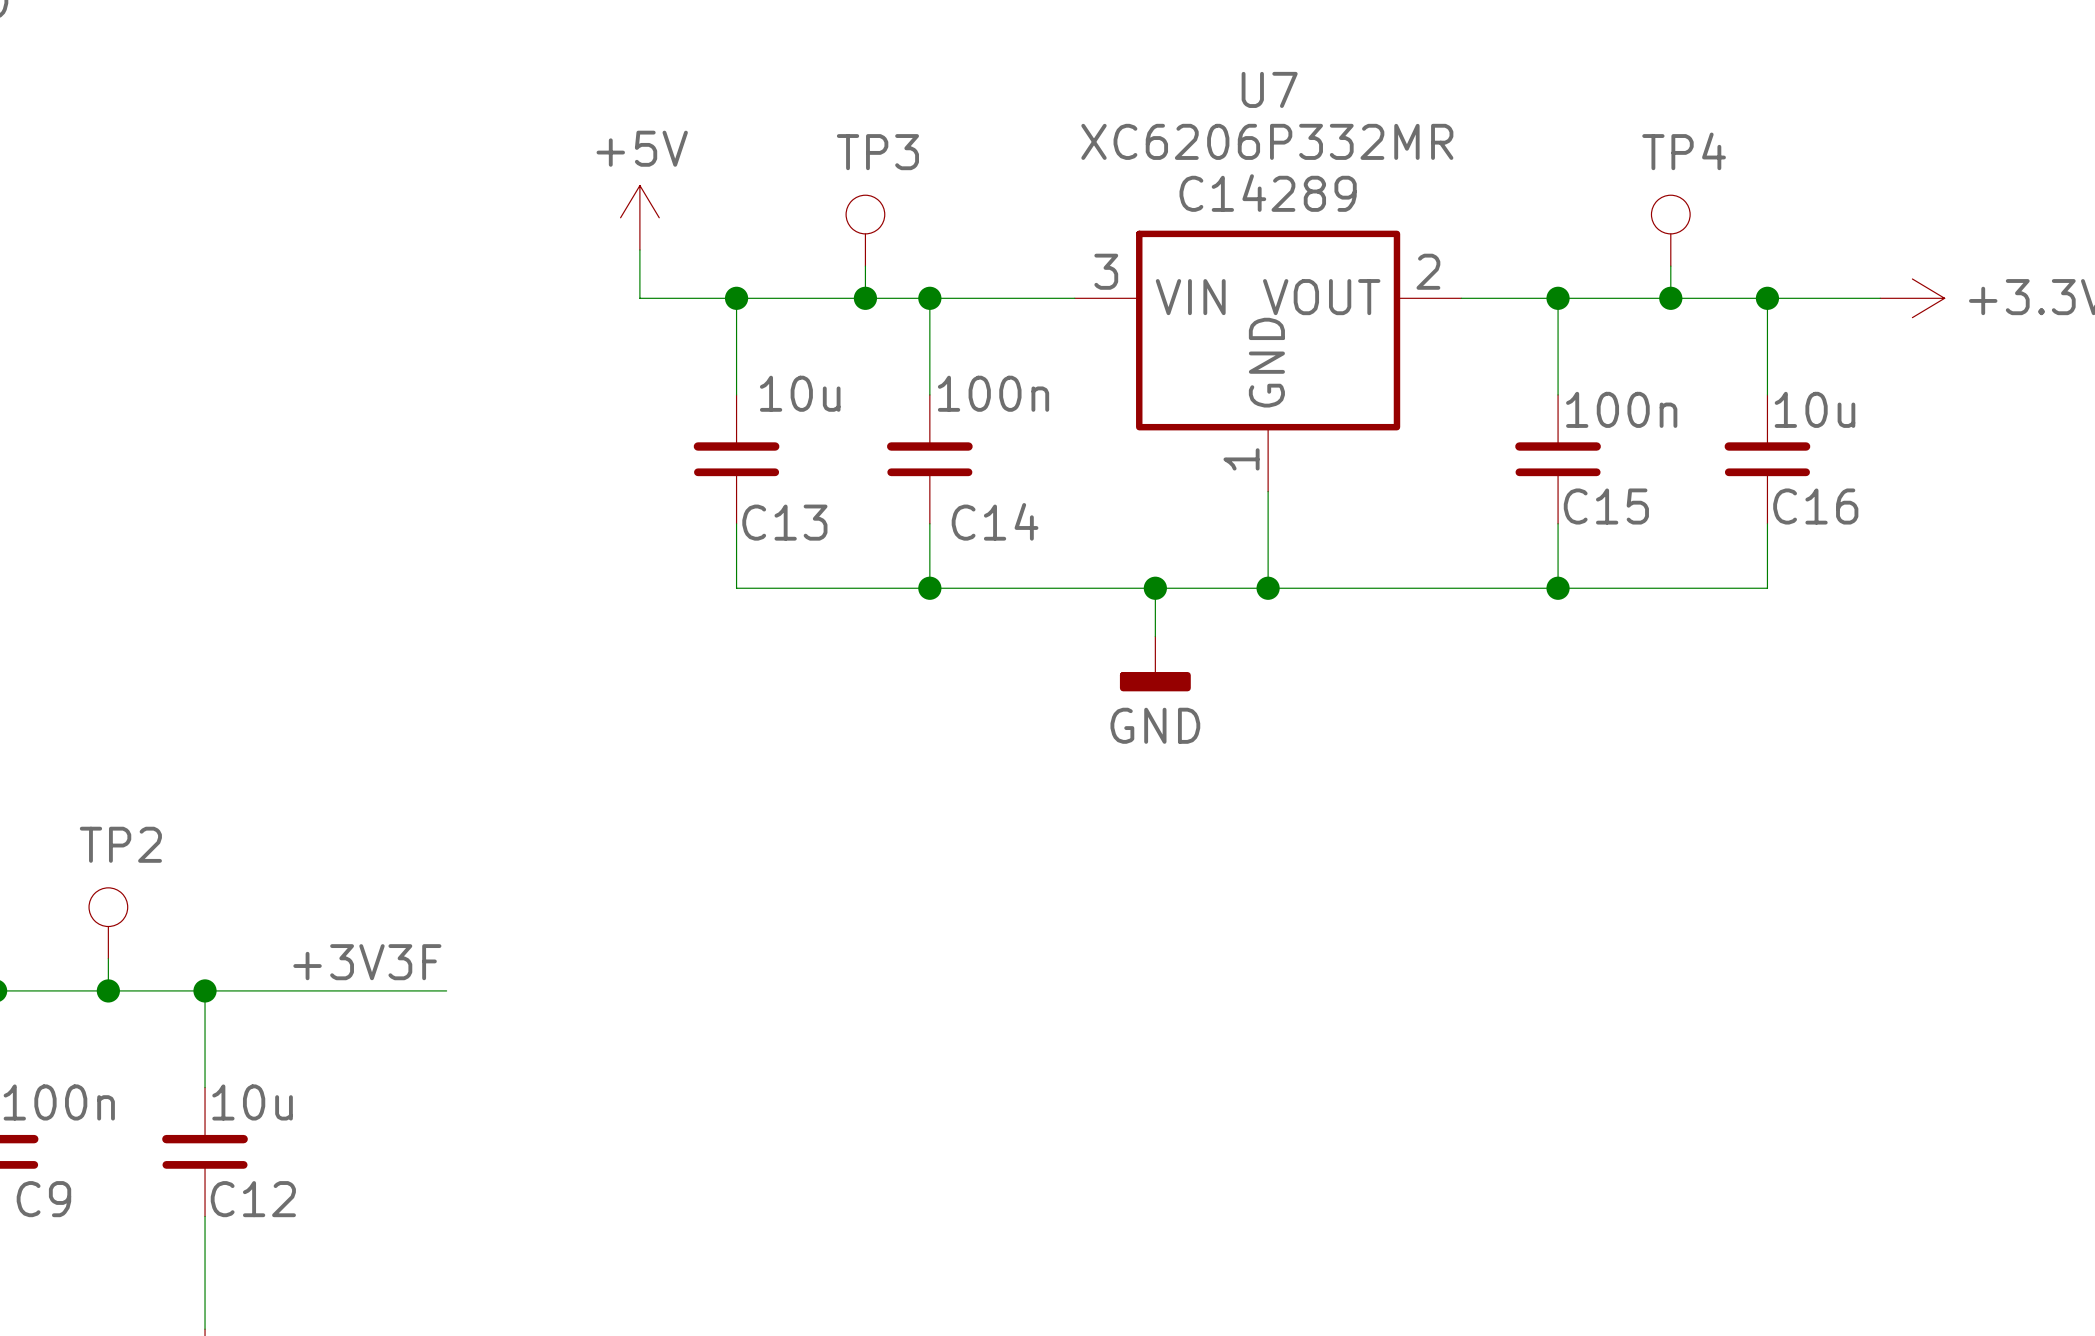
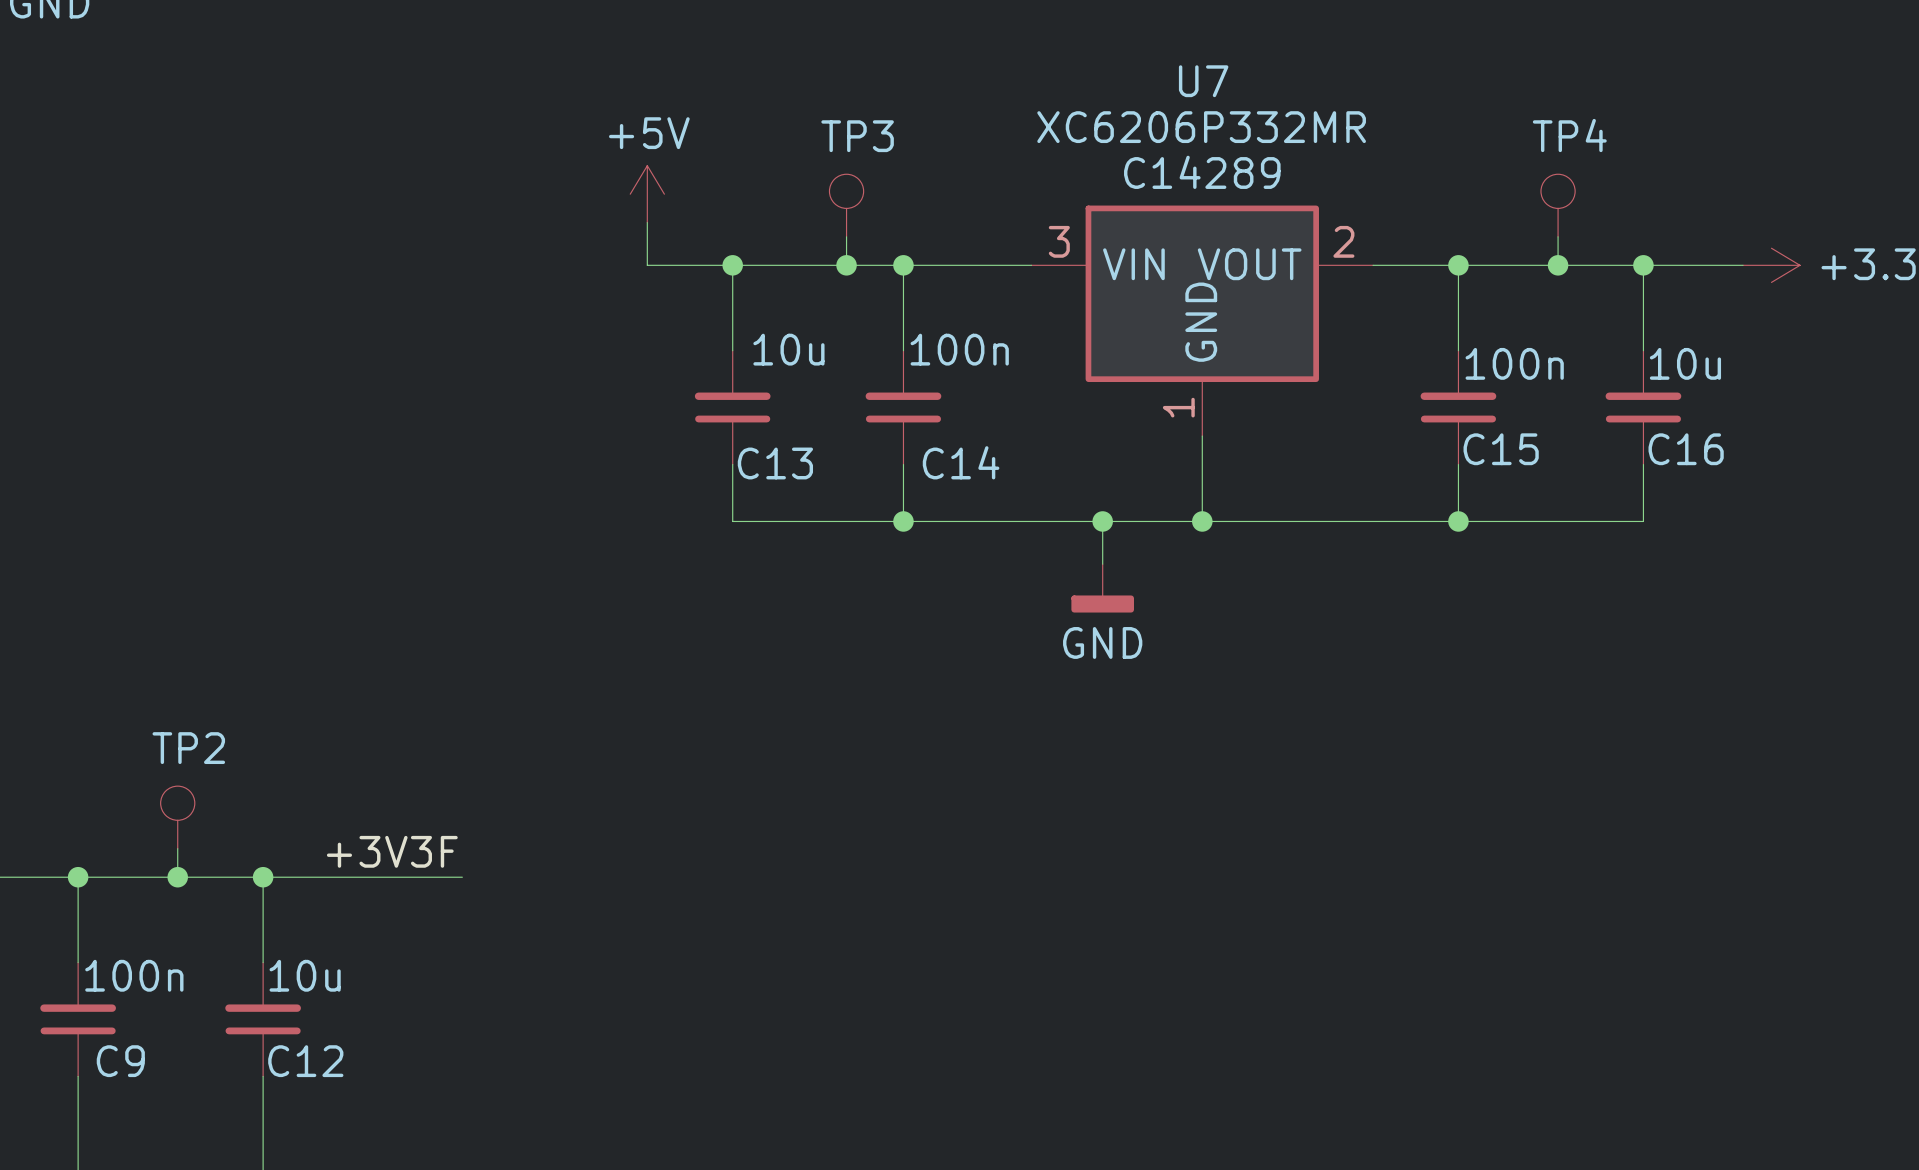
label position: +3V3F (367, 962) -> +3V3F (392, 851)
wire: (430, 990) (446, 990) -> none

